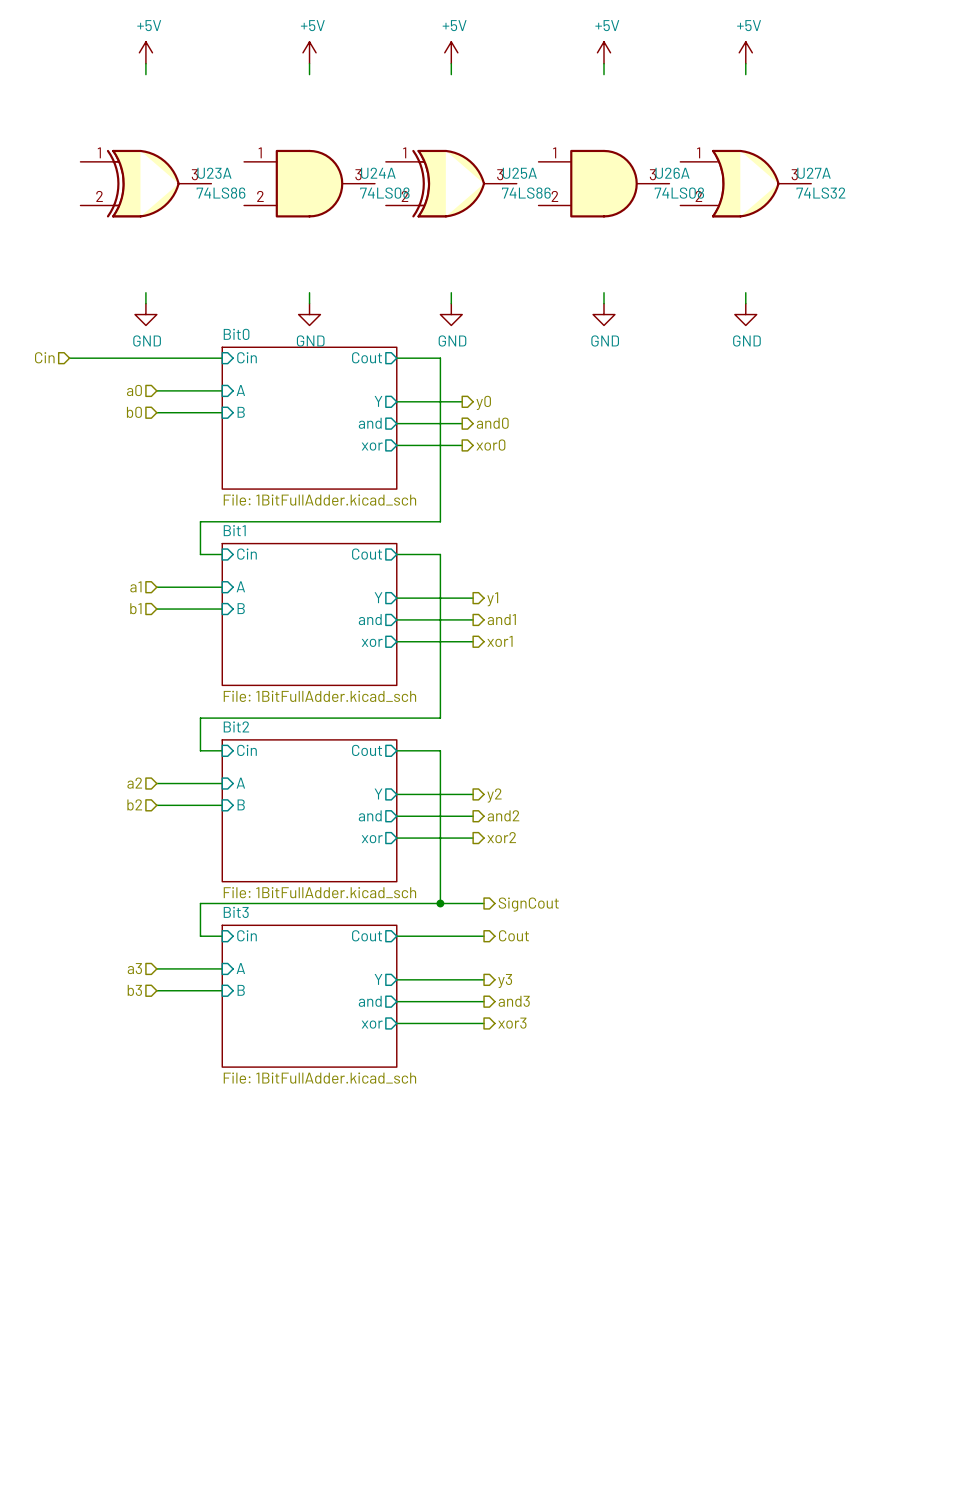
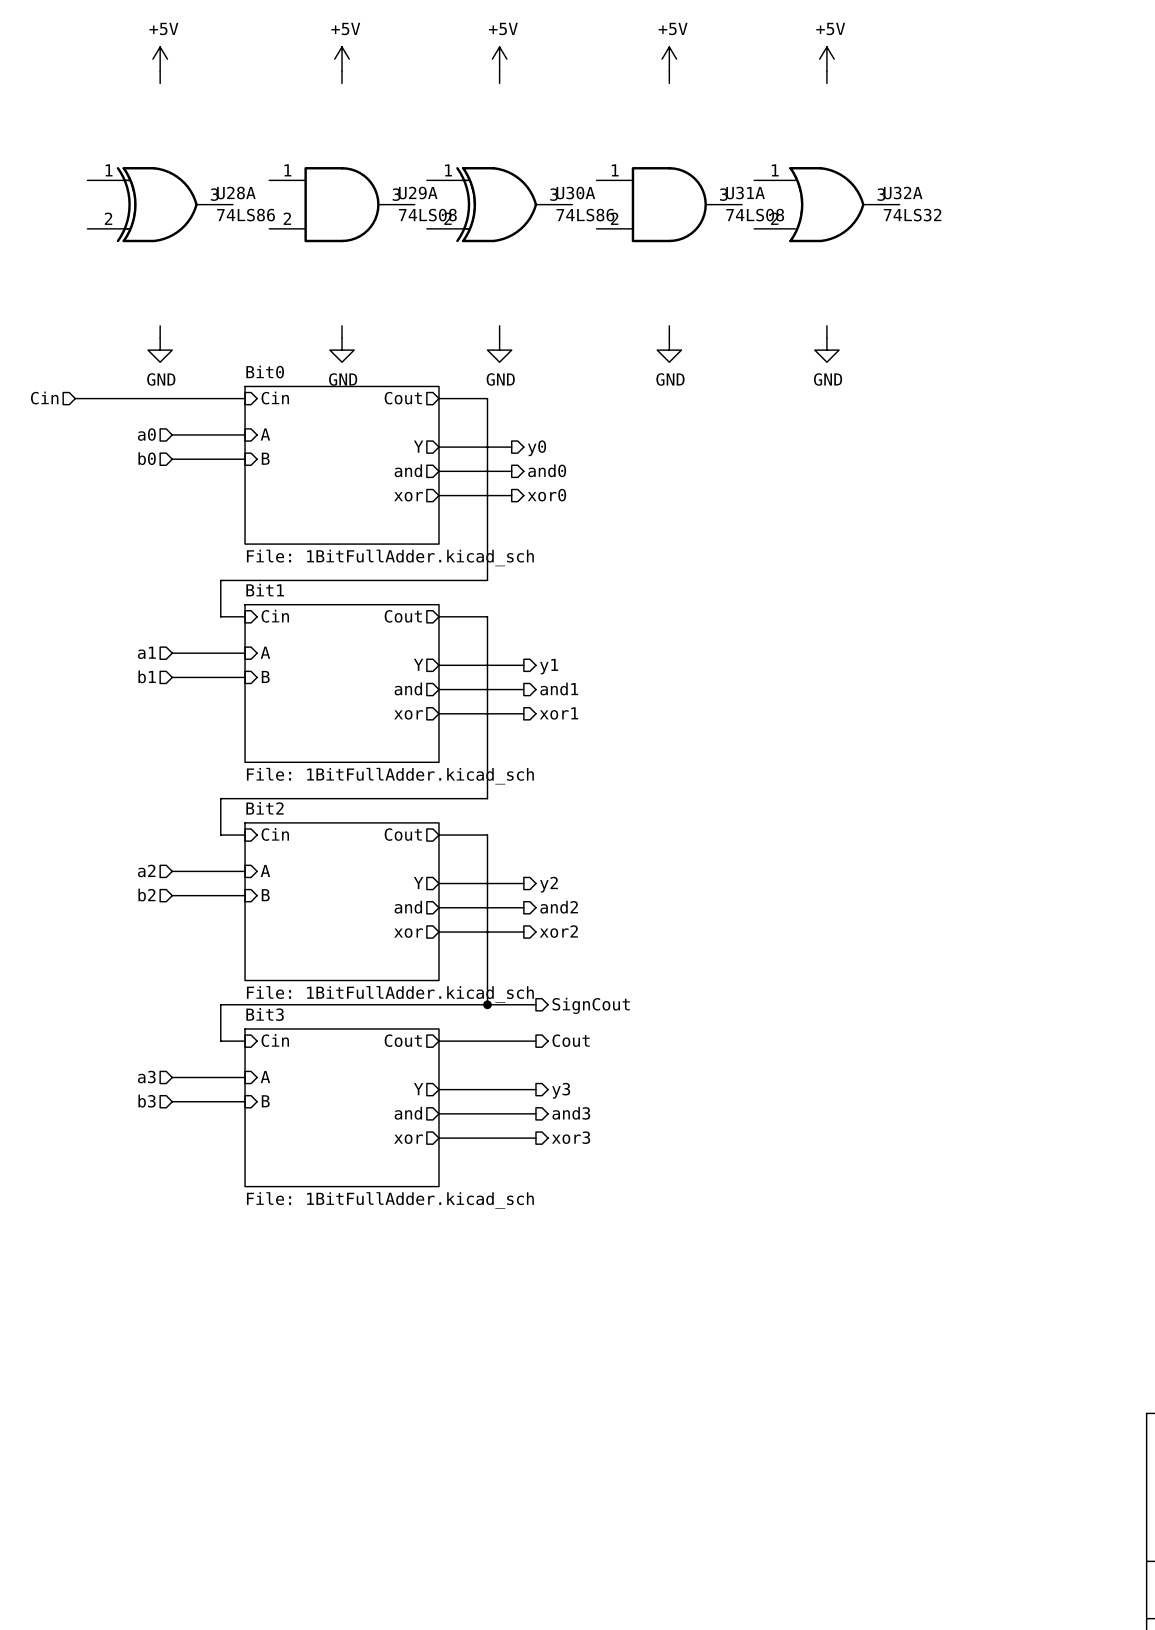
U23A name: U23A (214, 173) -> U28A (236, 193)
U24A name: U24A (378, 173) -> U29A (418, 193)
U25A name: U25A (519, 173) -> U30A (575, 193)
U26A name: U26A (672, 173) -> U31A (745, 193)
U27A name: U27A (813, 173) -> U32A (903, 193)

